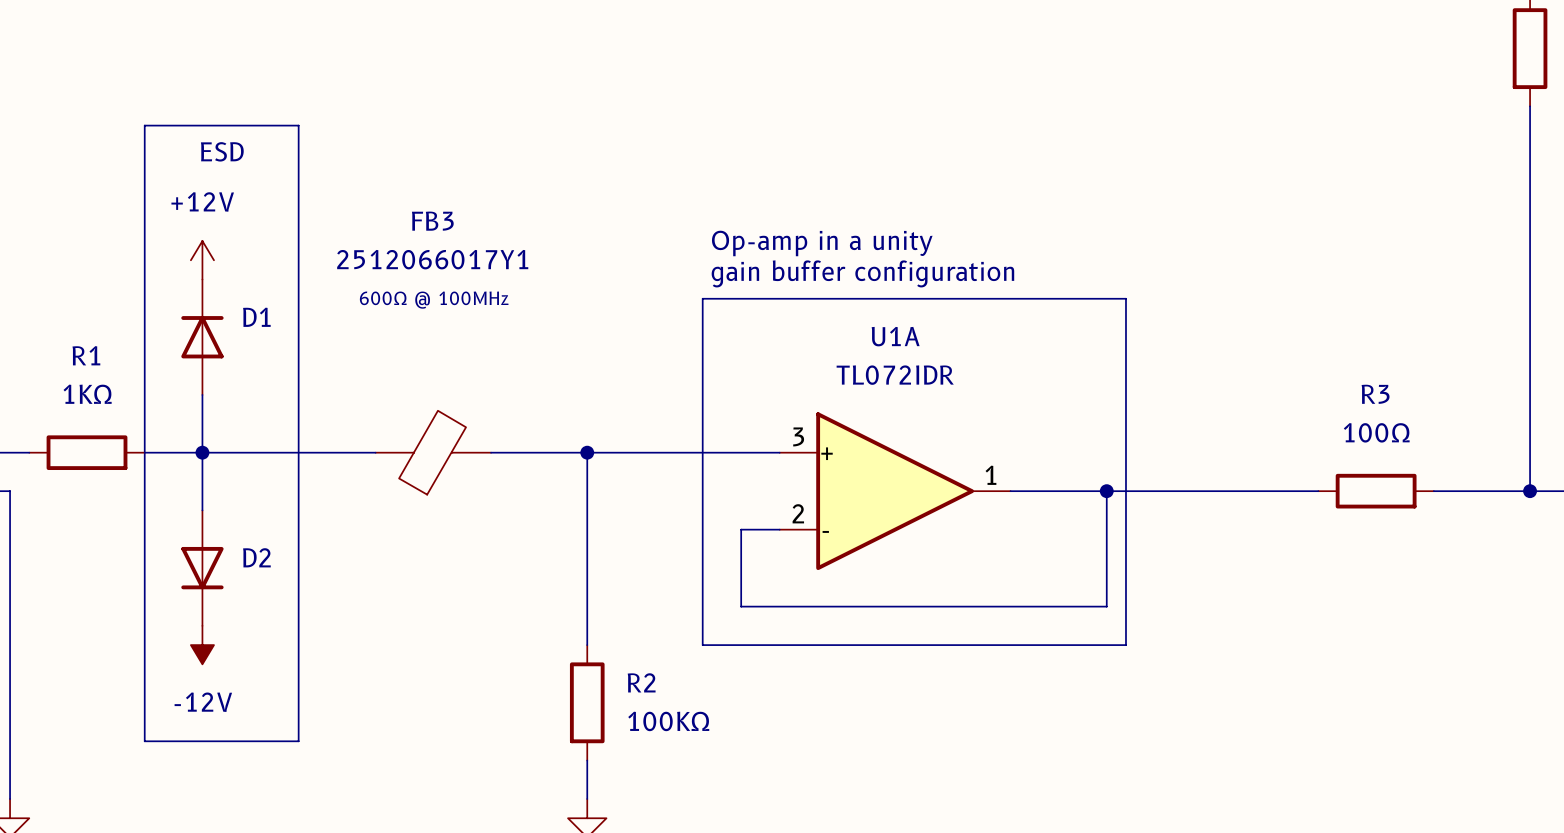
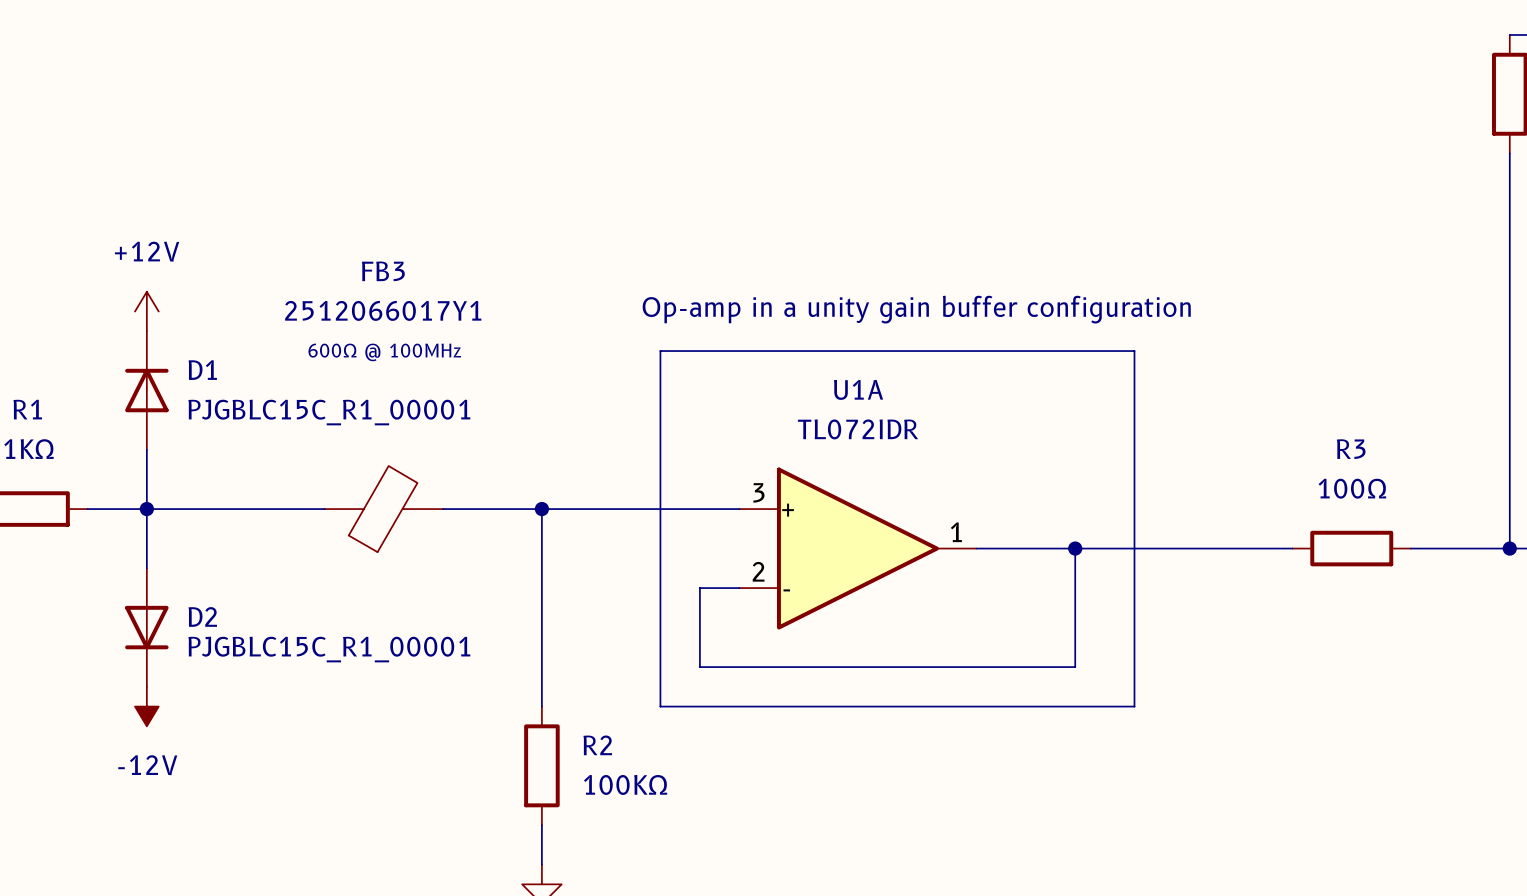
line: (144, 125) (298, 125) (298, 741) (144, 741) (144, 125) -> none
text: ESD (222, 151) -> none
text: Op-amp in a unity (822, 243) -> none
text: gain buffer configuration (862, 273) -> Op-amp in a unity gain buffer configuration (916, 309)
line: (1125, 298) (1125, 645) -> (1094, 351) (1134, 351) (1134, 706) (1094, 706)
D1 value: none -> PJGBLC15C_R1_00001 (329, 412)
D2 value: none -> PJGBLC15C_R1_00001 (329, 649)

